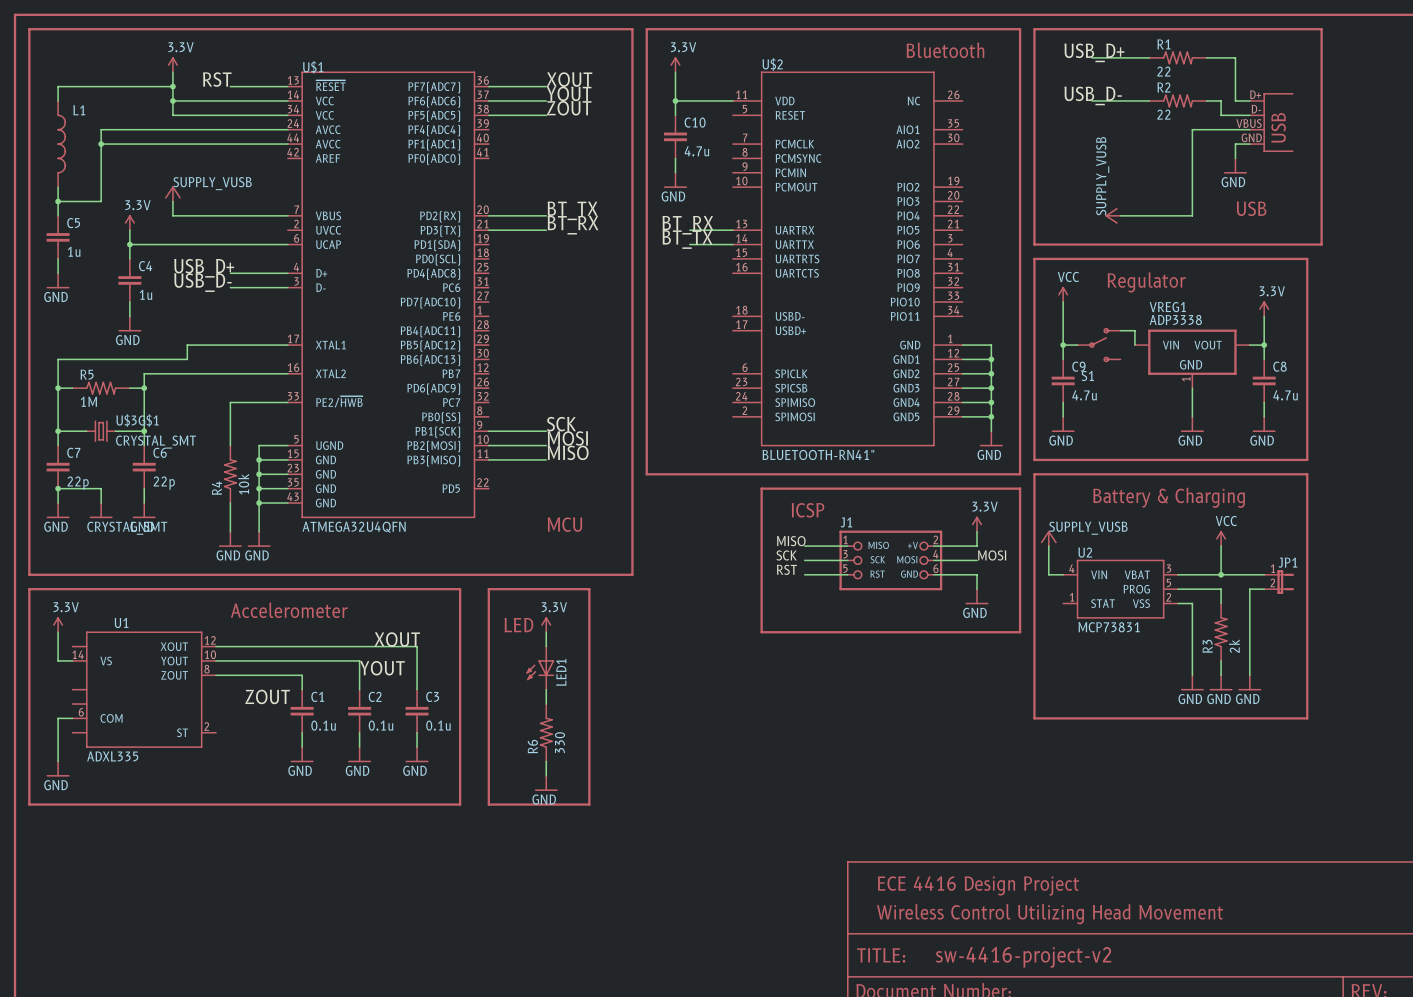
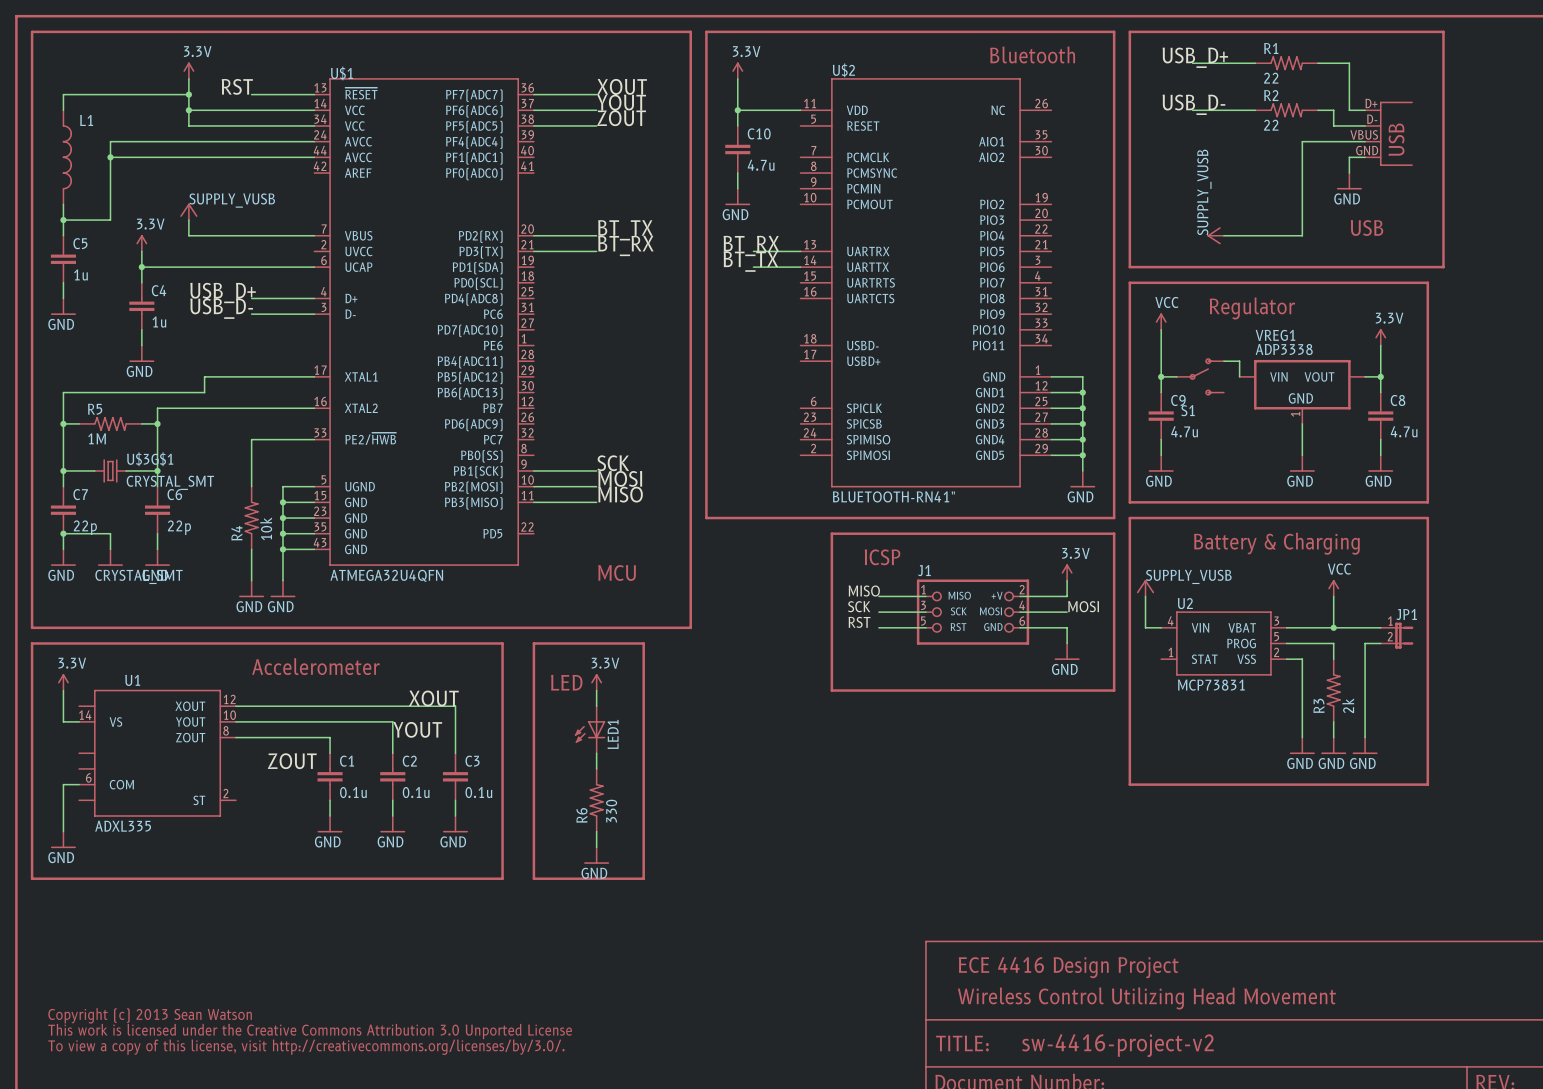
text: none -> Copyright (c) 2013 Sean Watson (150, 1015)
text: none -> This work is licensed under the Creative Commons Attribution 3.0 Unported License (310, 1031)
text: none -> To view a copy of this license, visit http://creativecommons.org/licenses/by/3.0/. (306, 1047)

